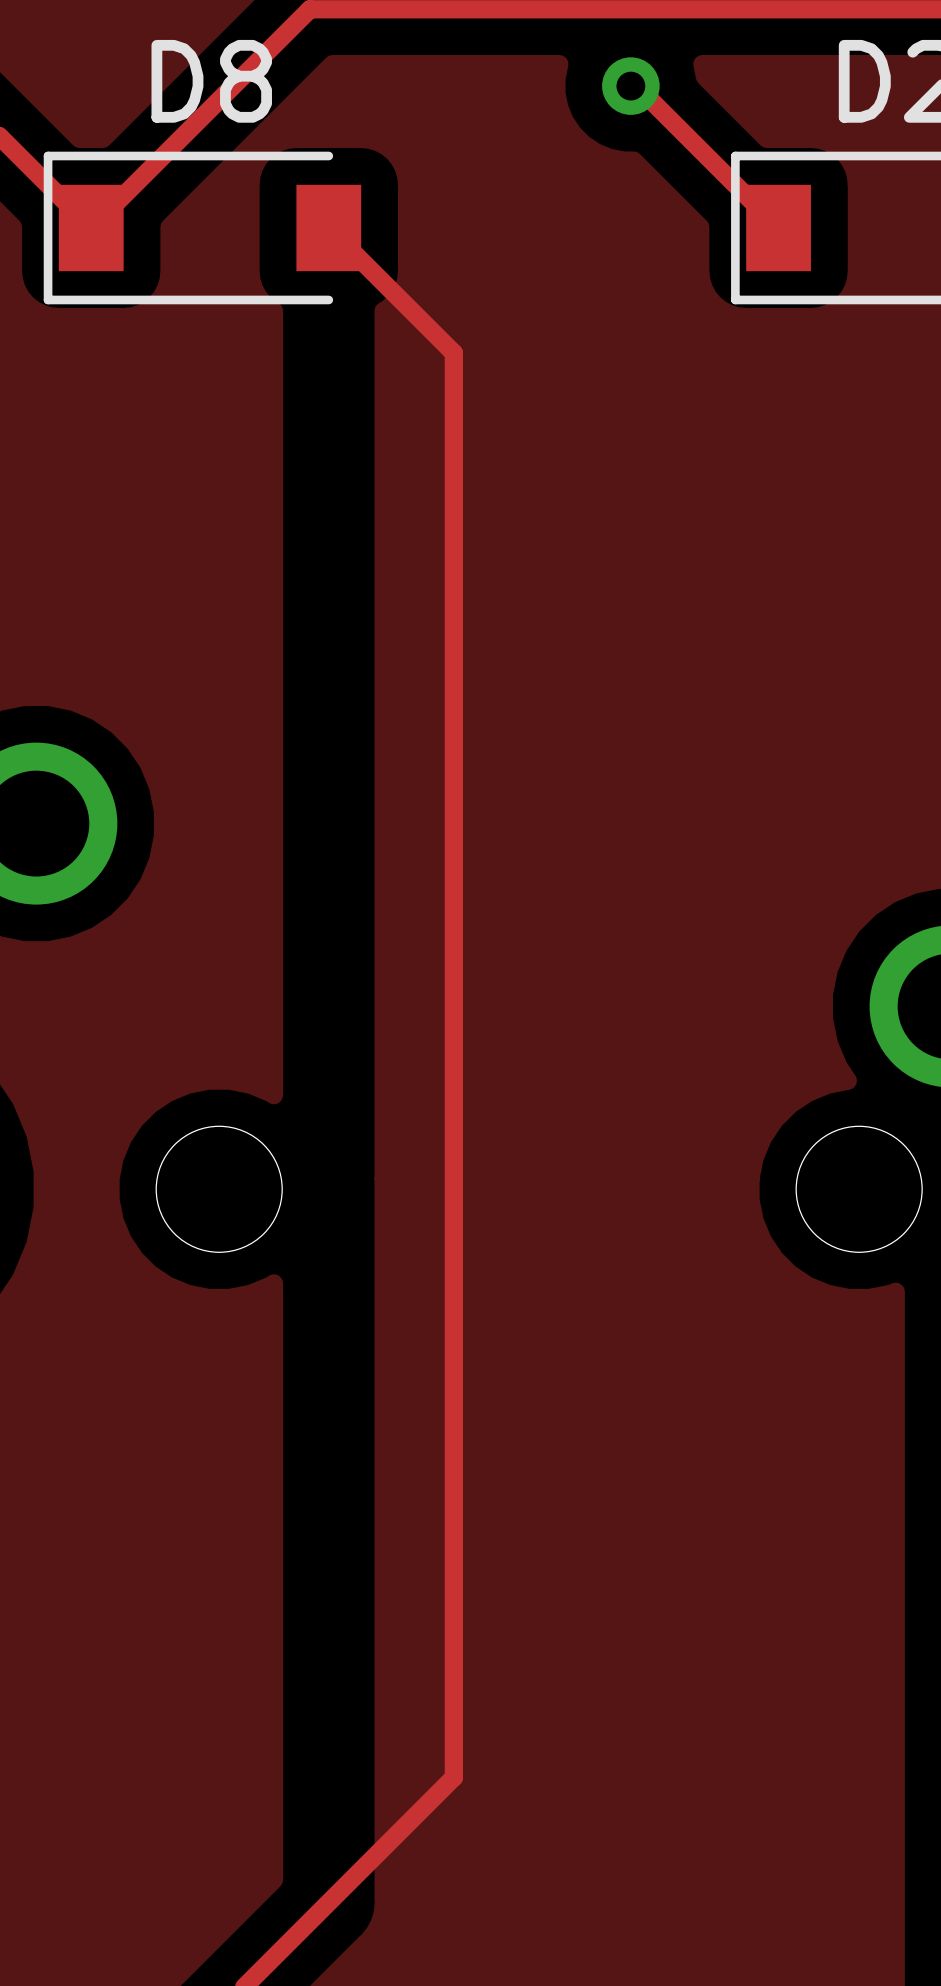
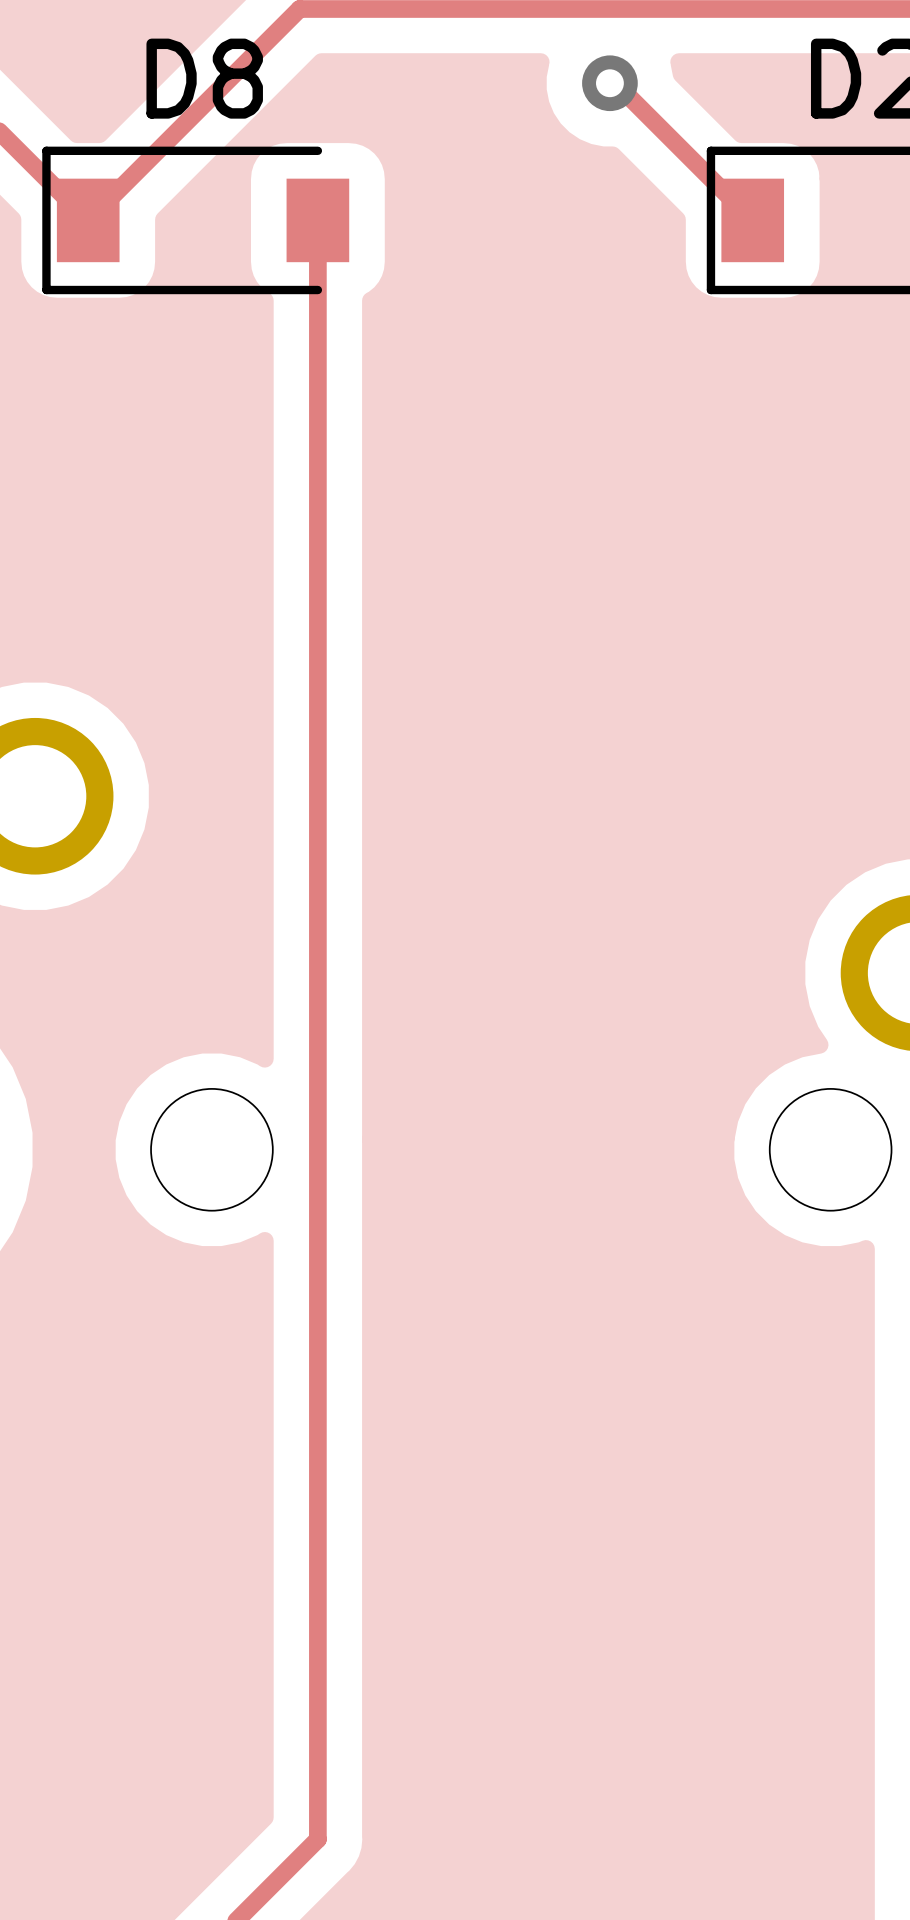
track: (328, 227) (453, 353) (453, 1777) (328, 1902) -> (317, 220) (317, 1839)

